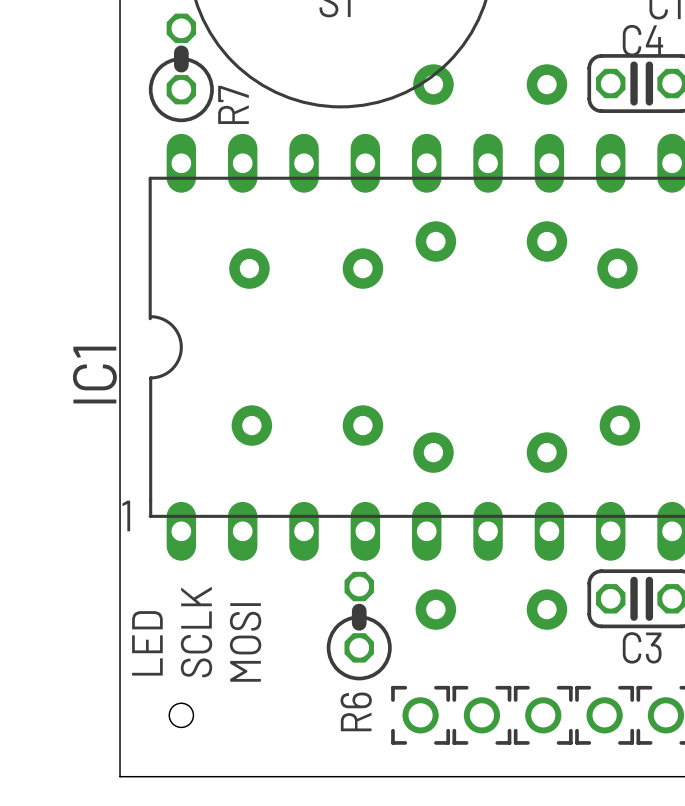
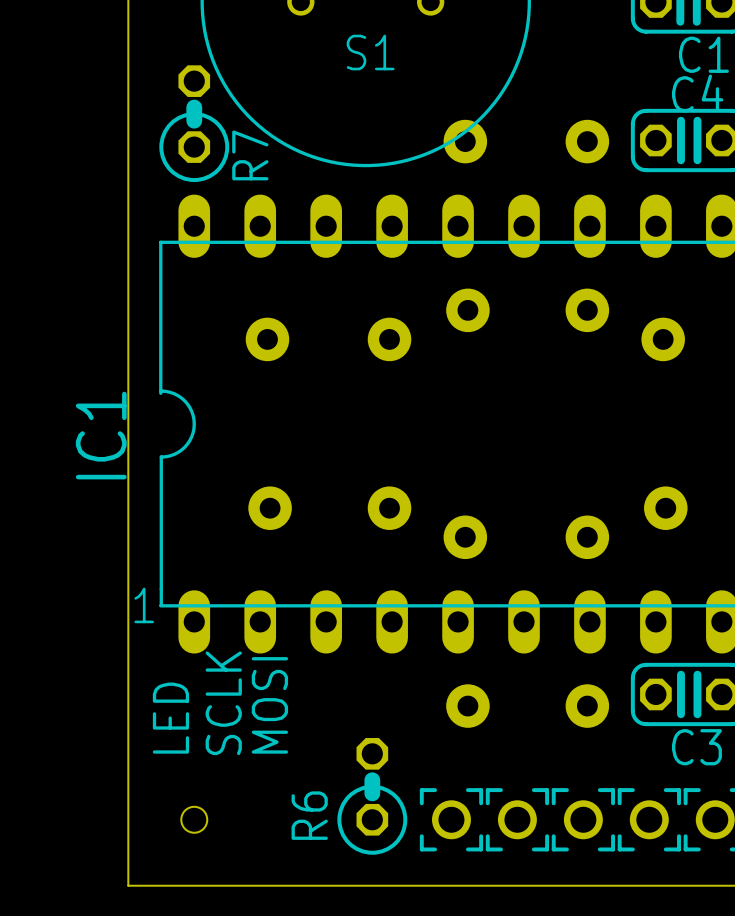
R6 position: (359, 626) -> (372, 796)
SCLK name position: SCLK (196, 632) -> SCLK (223, 703)
MOSI name position: MOSI (245, 642) -> MOSI (269, 705)
LED name position: LED (147, 643) -> LED (170, 718)
R6 name position: R6 (356, 711) -> R6 (309, 815)

